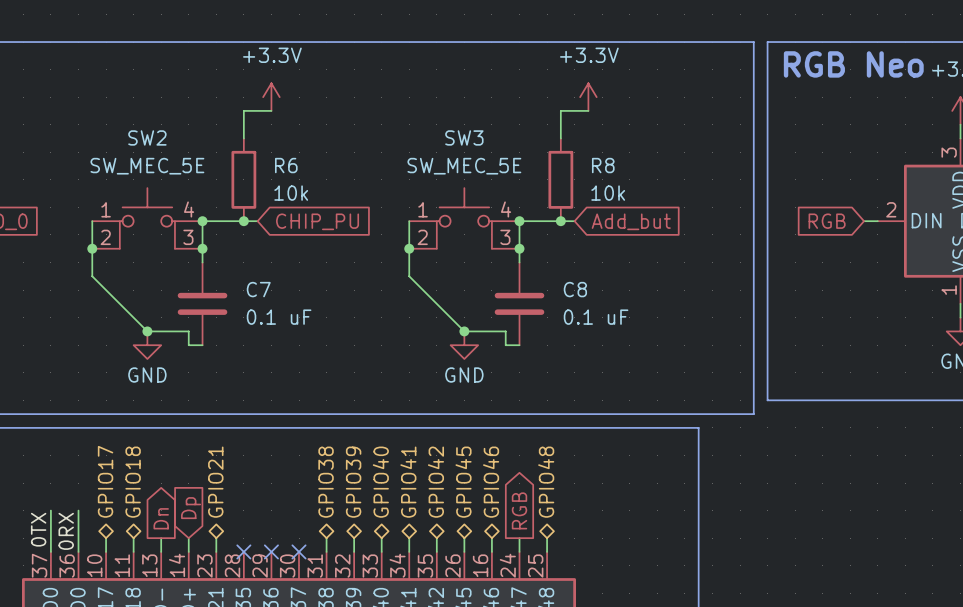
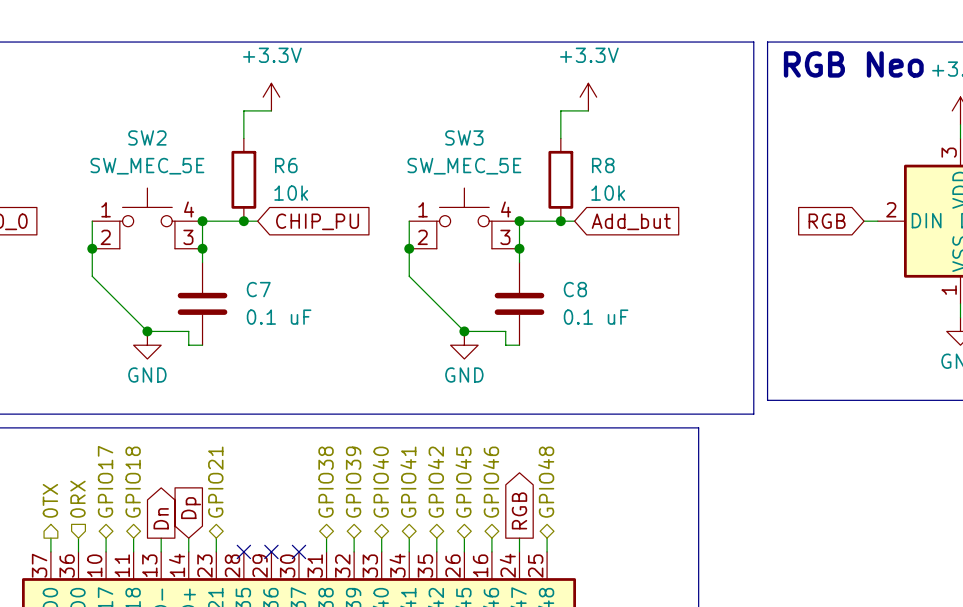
hierarchical label: none -> 0RX (77, 499)
hierarchical label: none -> 0TX (50, 500)
wire: (50, 510) (50, 538) -> none
wire: (78, 510) (78, 538) -> none
label: 0TX (38, 529) -> none
label: 0RX (66, 531) -> none

